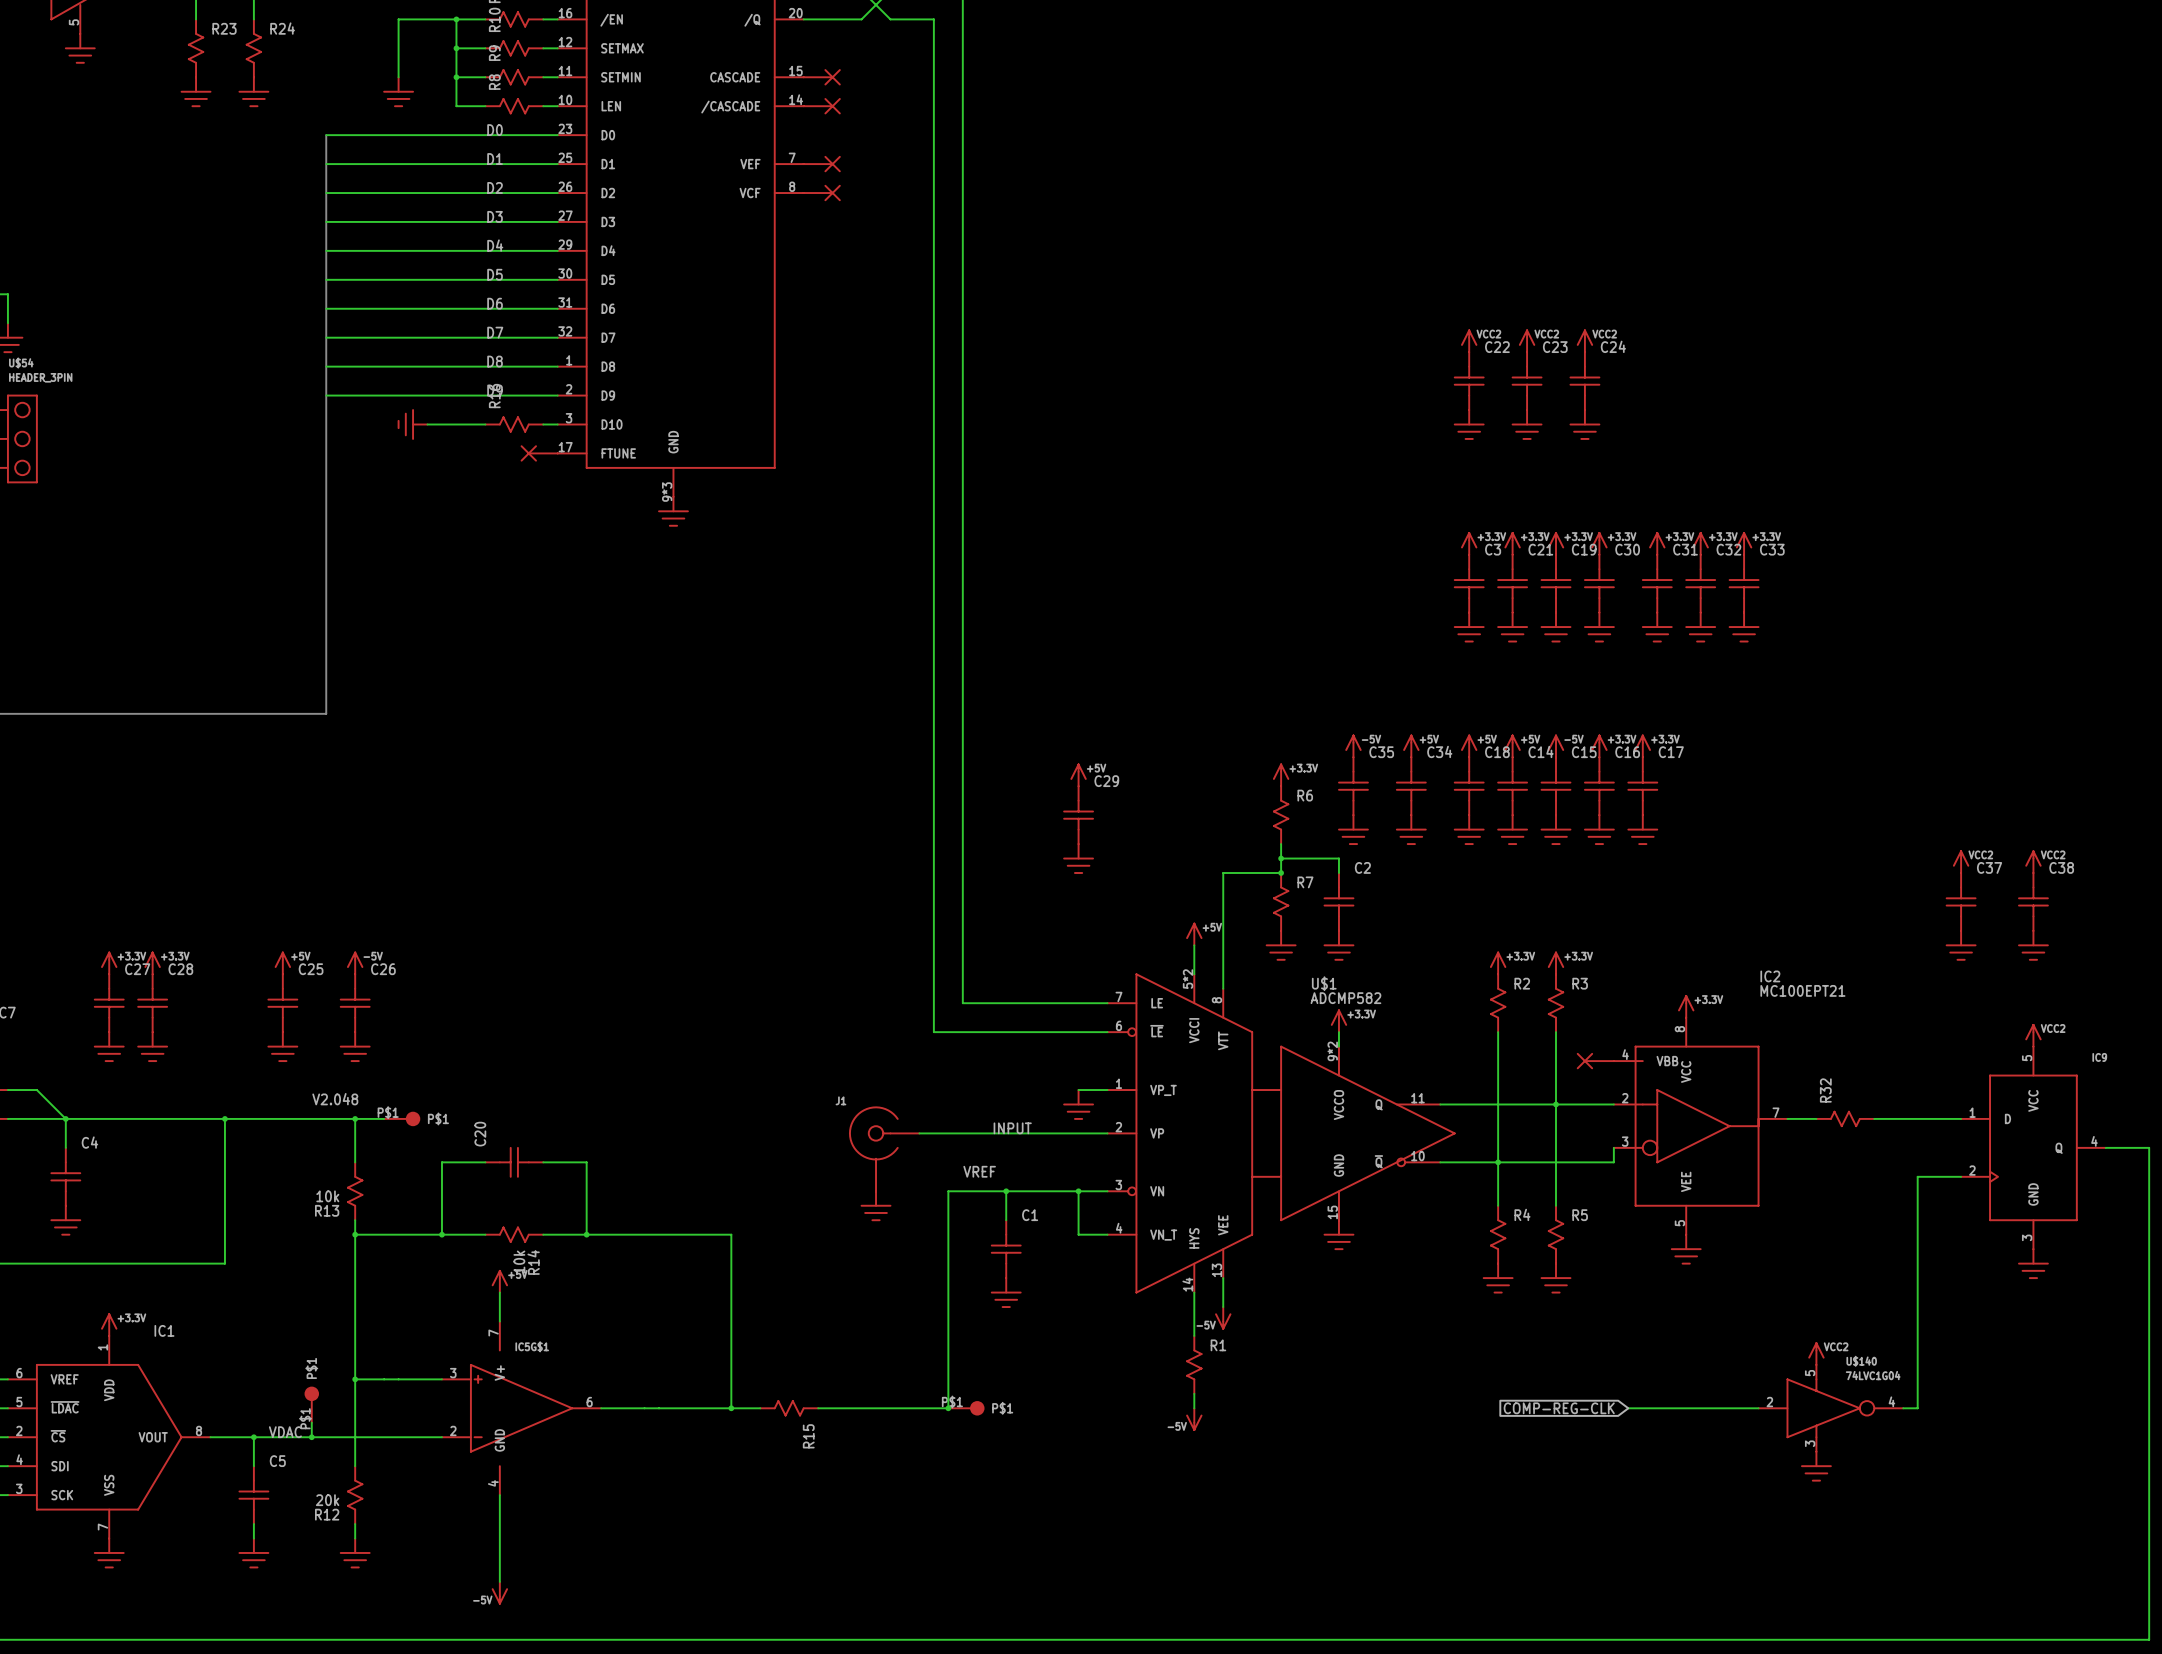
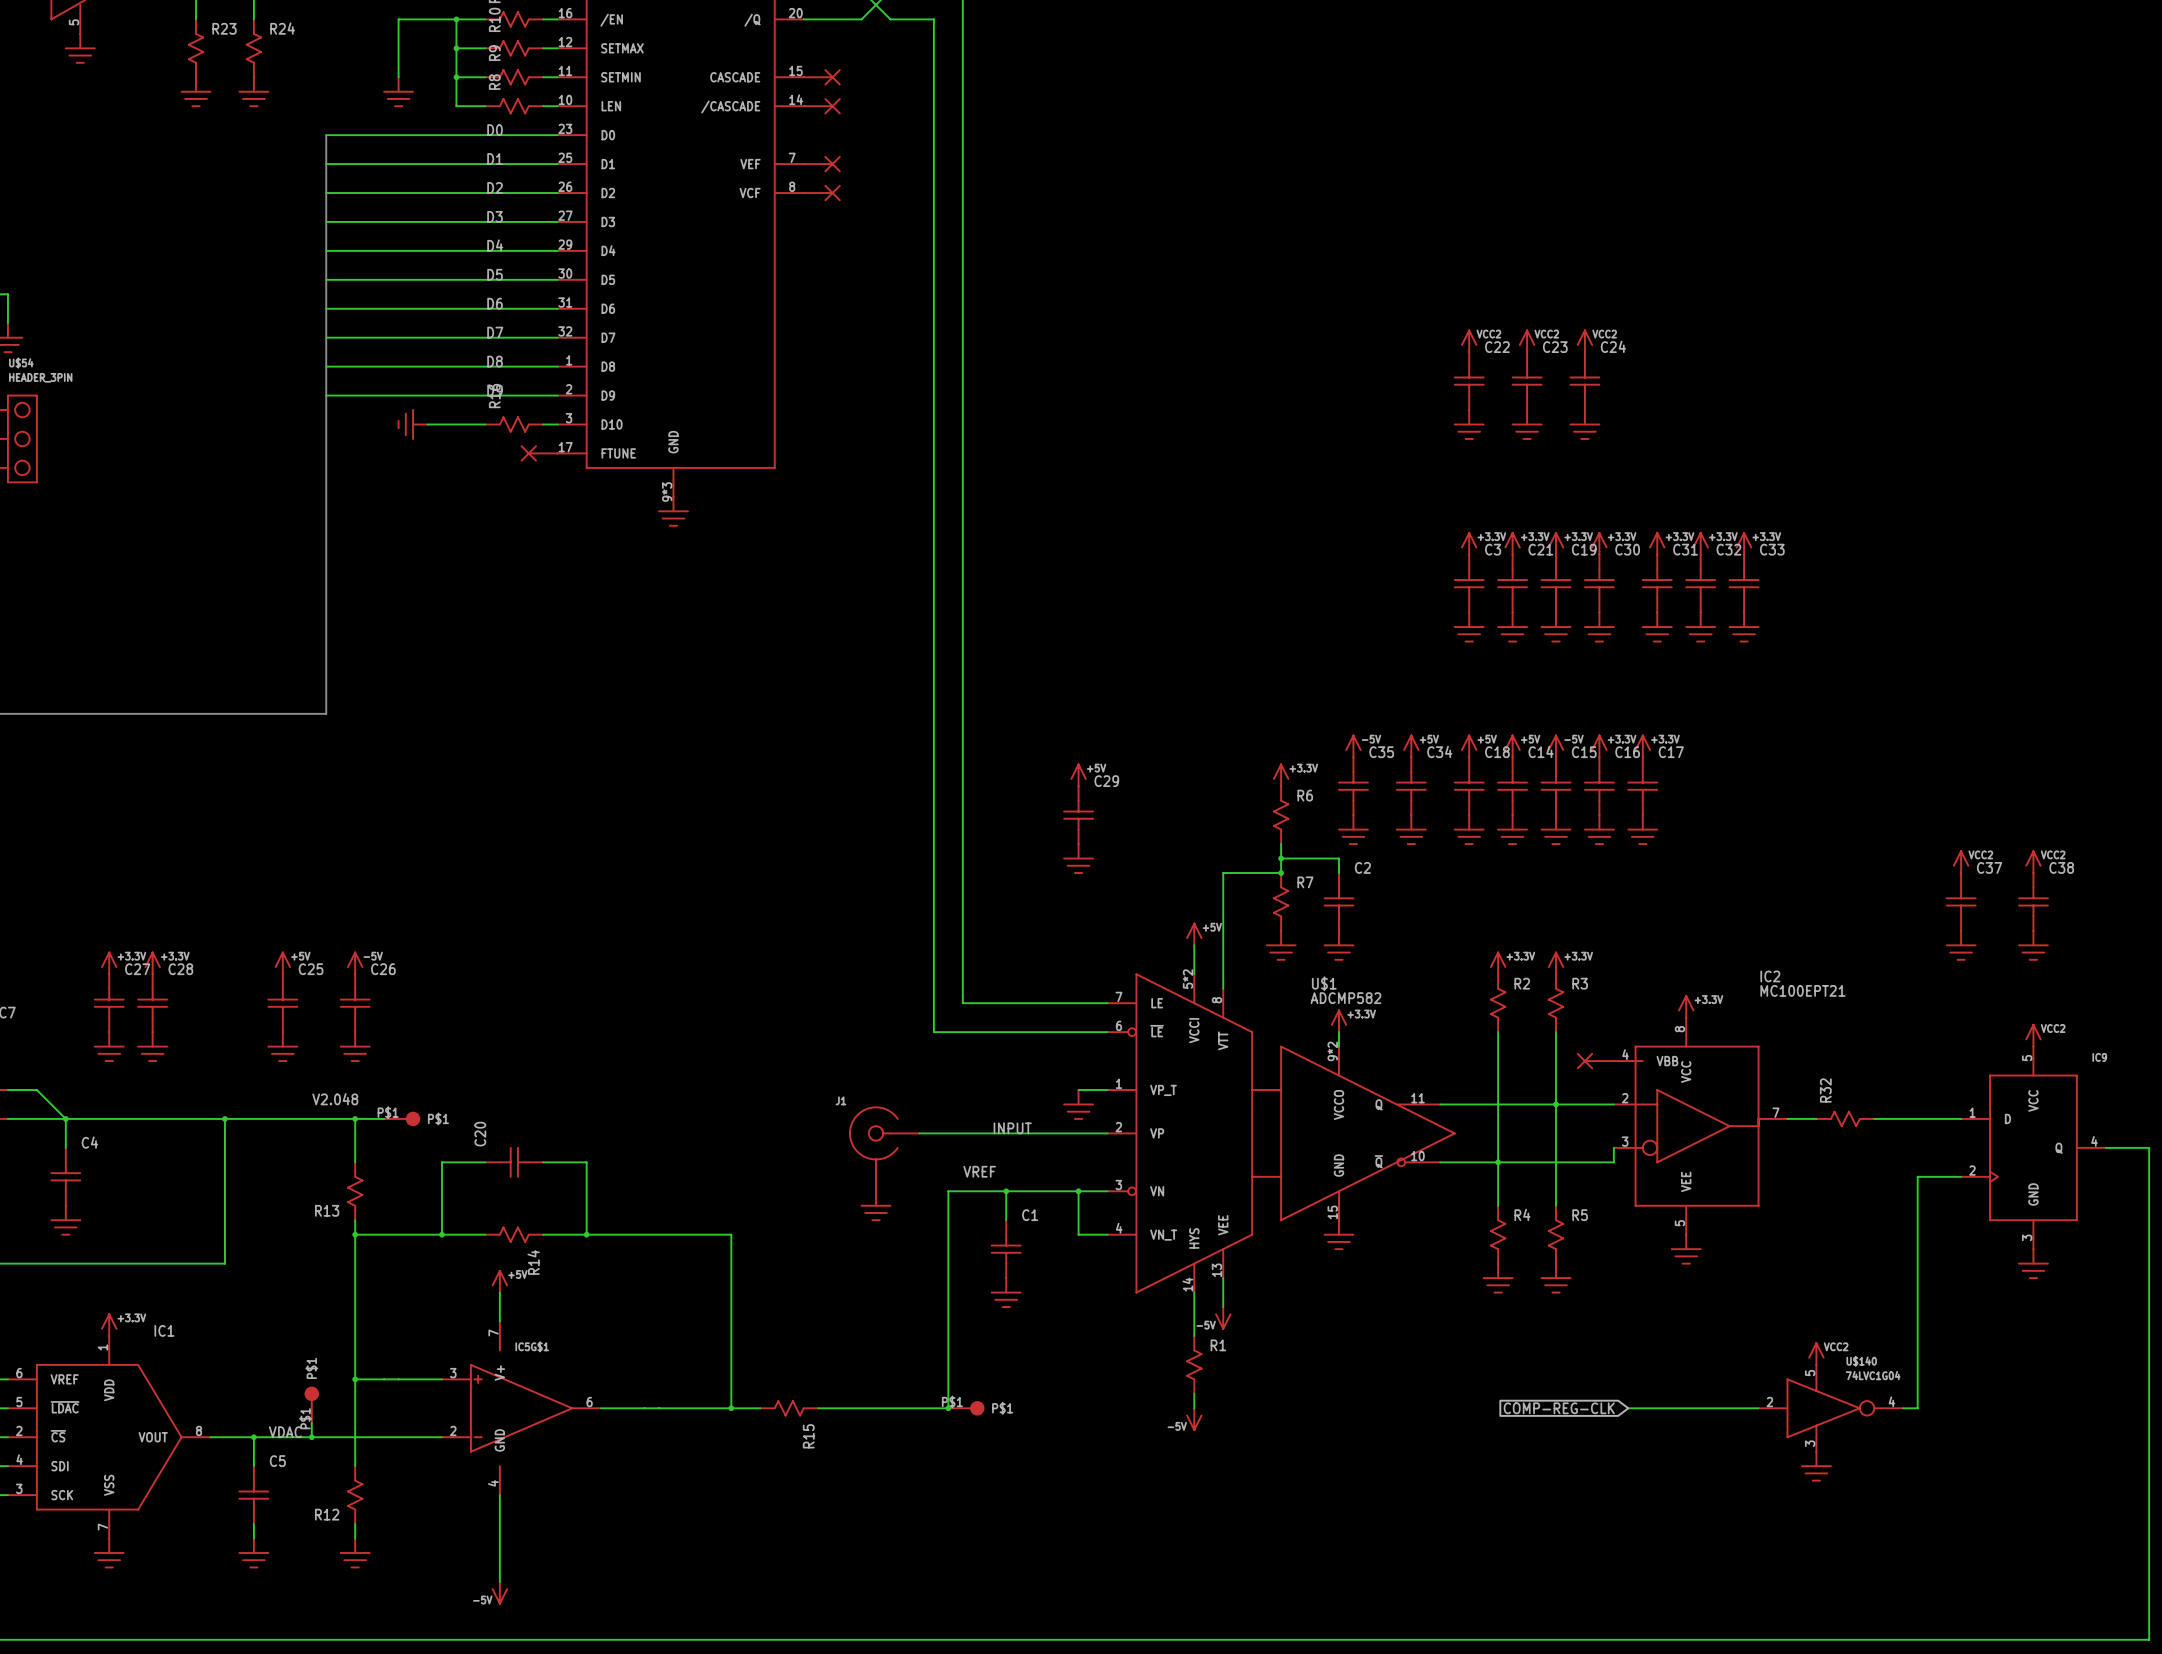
R13 value: 10k (327, 1196) -> none
R14 value: 10k (519, 1262) -> none
R12 value: 20k (327, 1500) -> none

